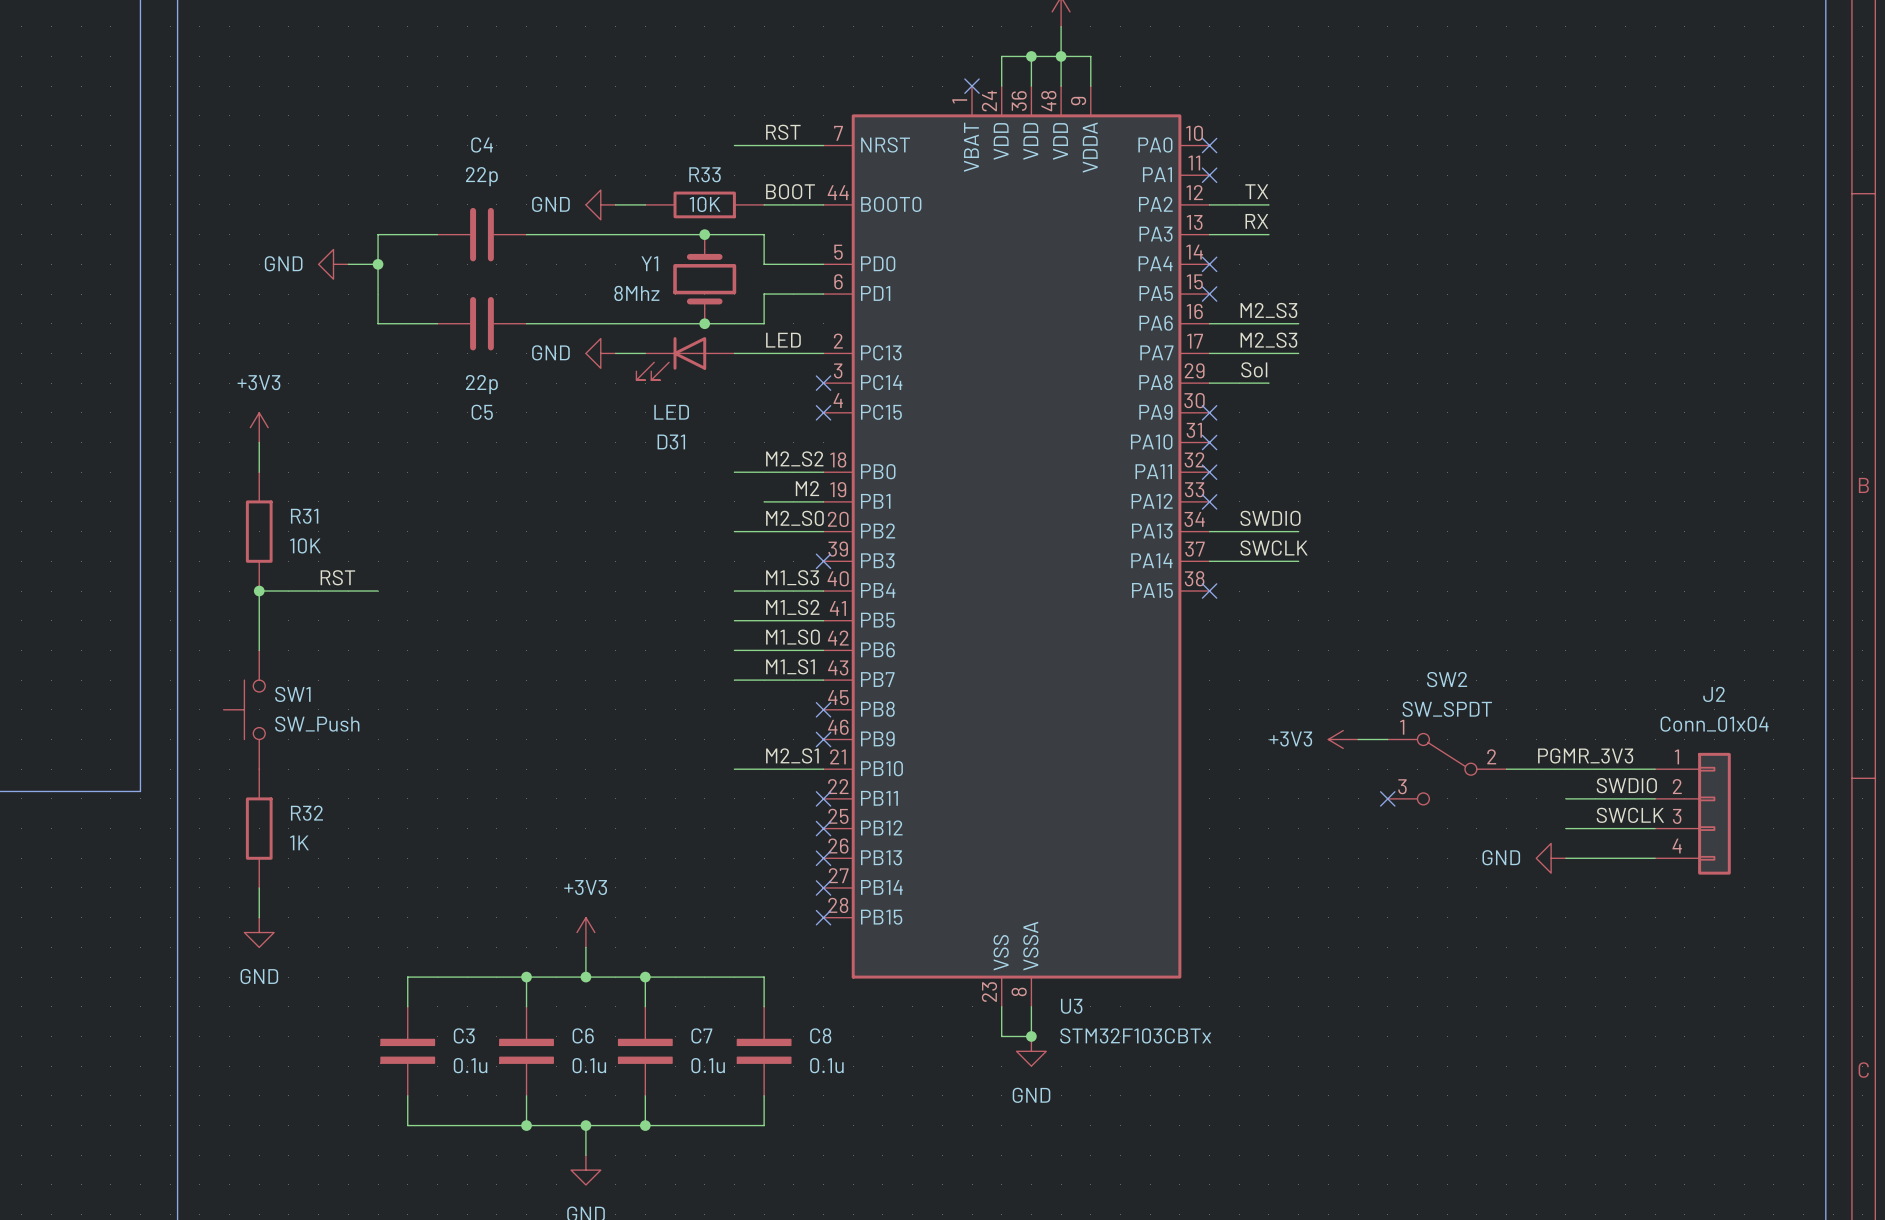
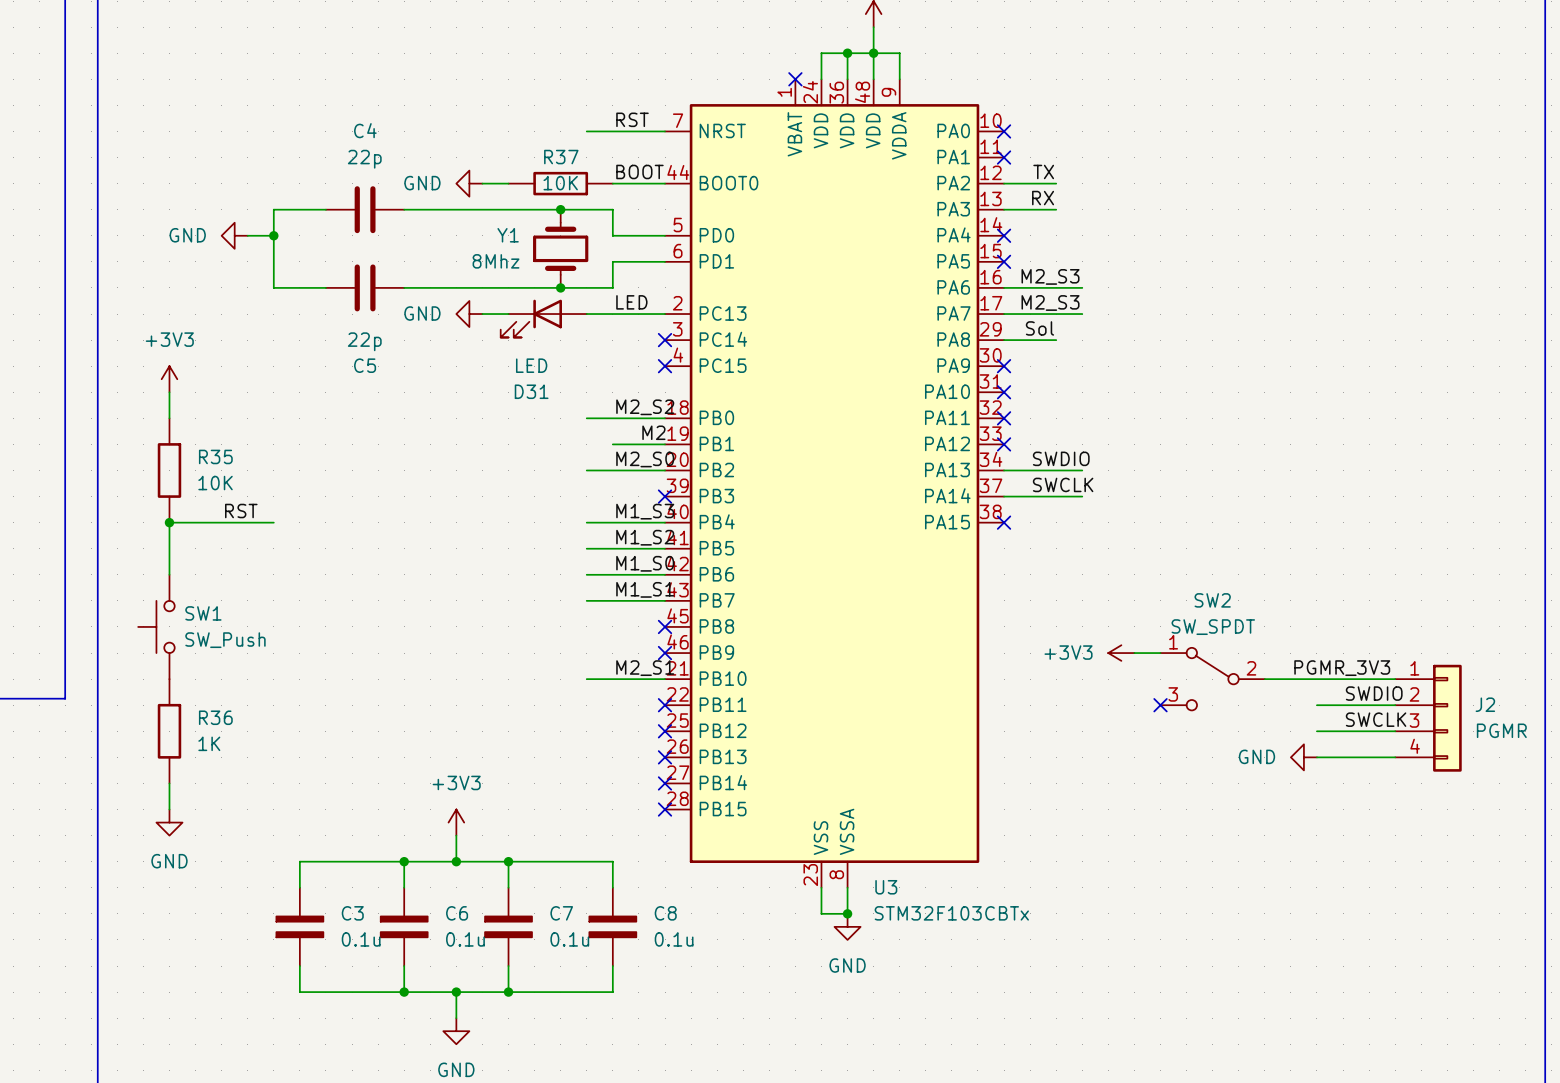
R33 name: R33 (705, 174) -> R37 (561, 157)
R31 name: R31 (304, 516) -> R35 (215, 456)
J2 name position: J2 (1714, 694) -> J2 (1485, 704)
J2 value: Conn_01x04 (1714, 724) -> PGMR (1501, 730)
R32 name: R32 (306, 813) -> R36 (215, 717)

